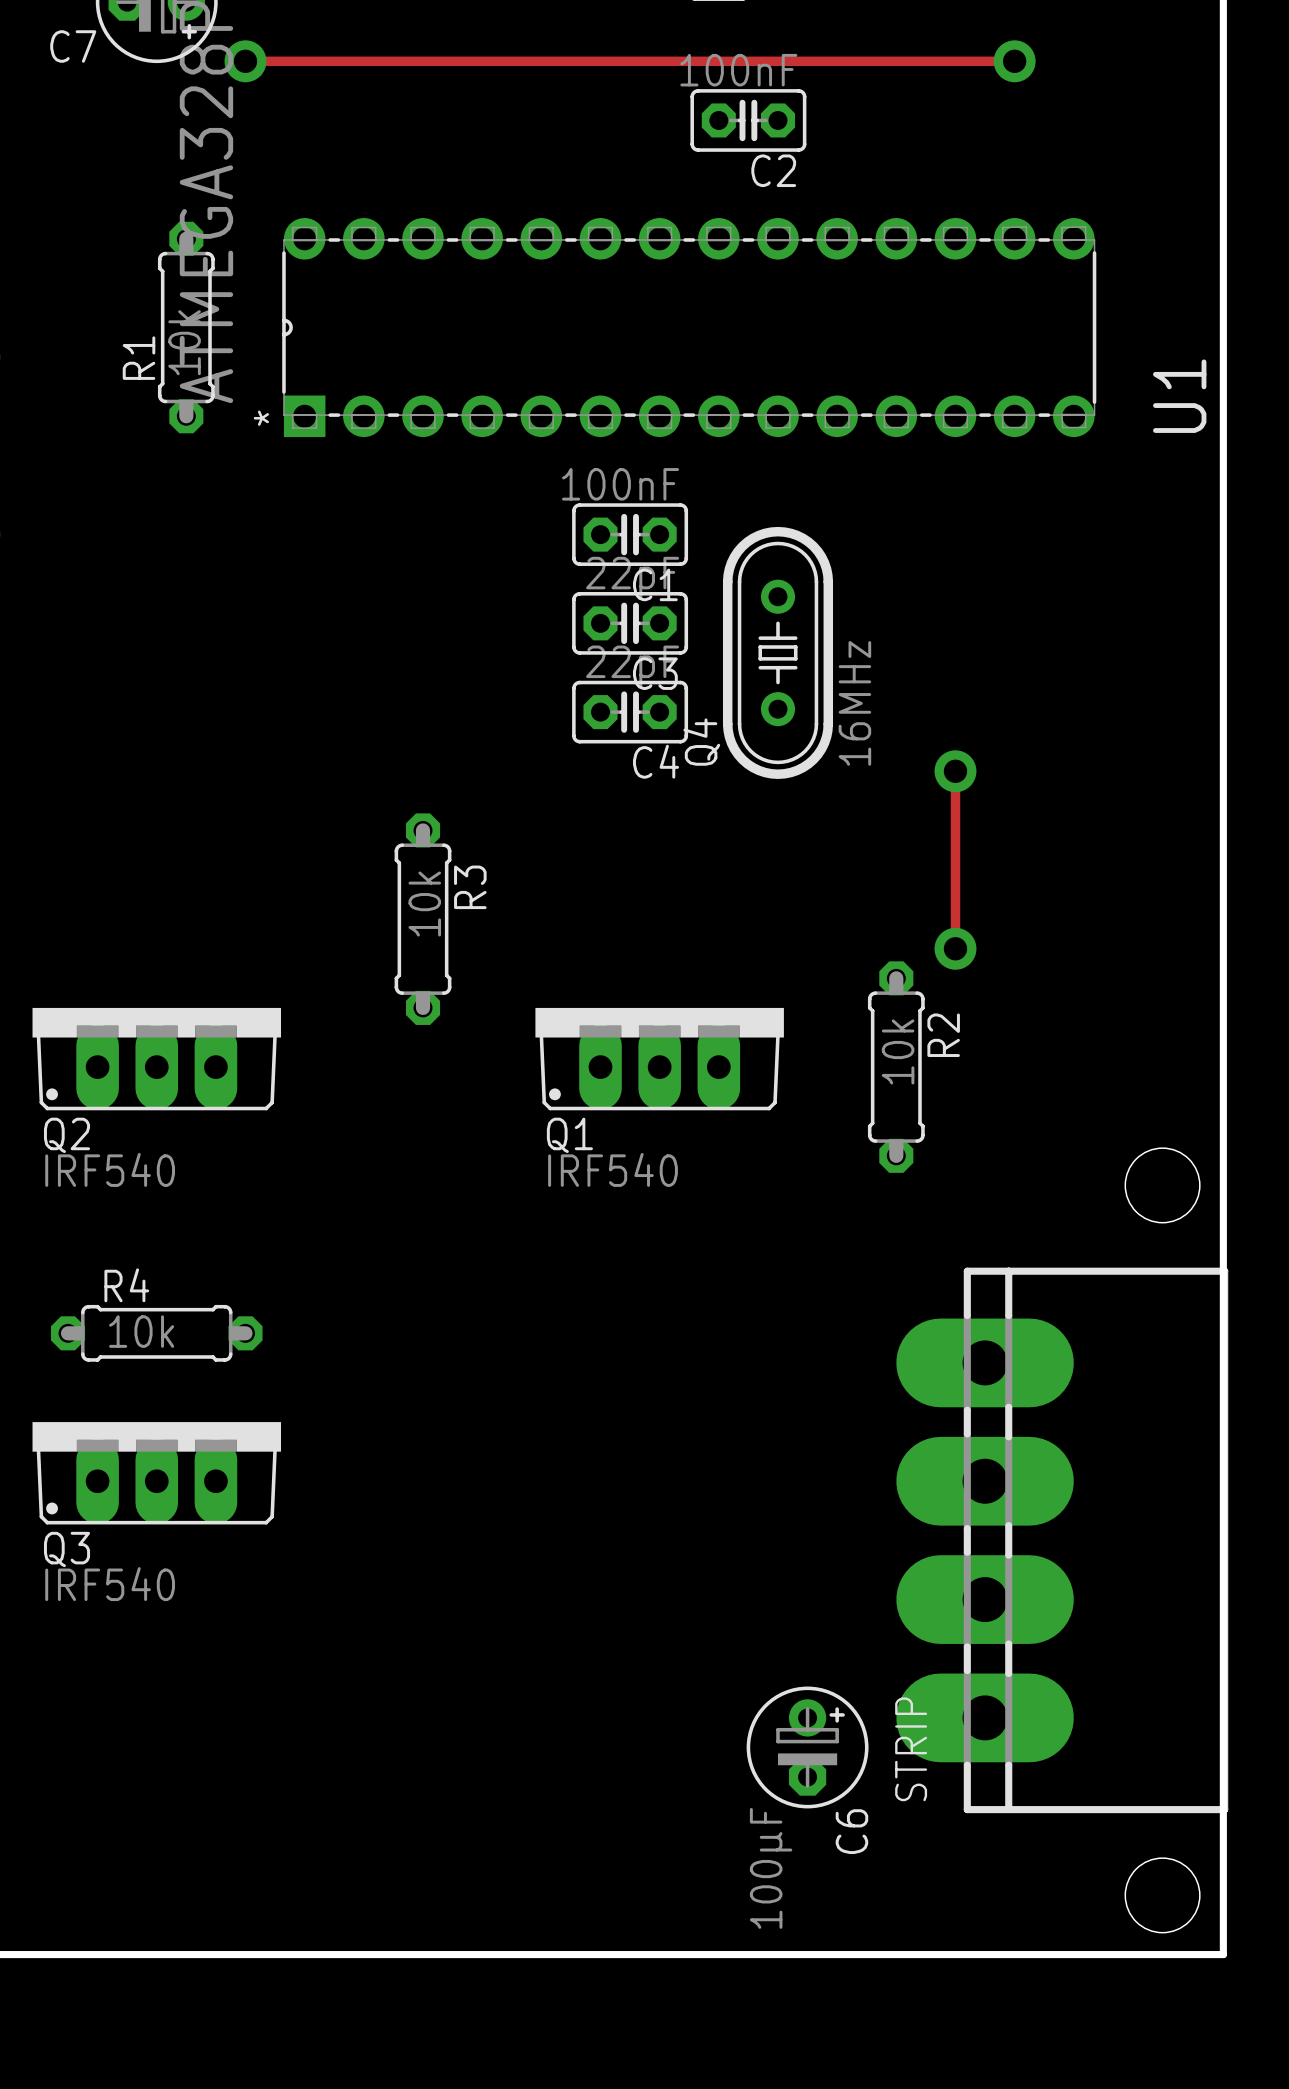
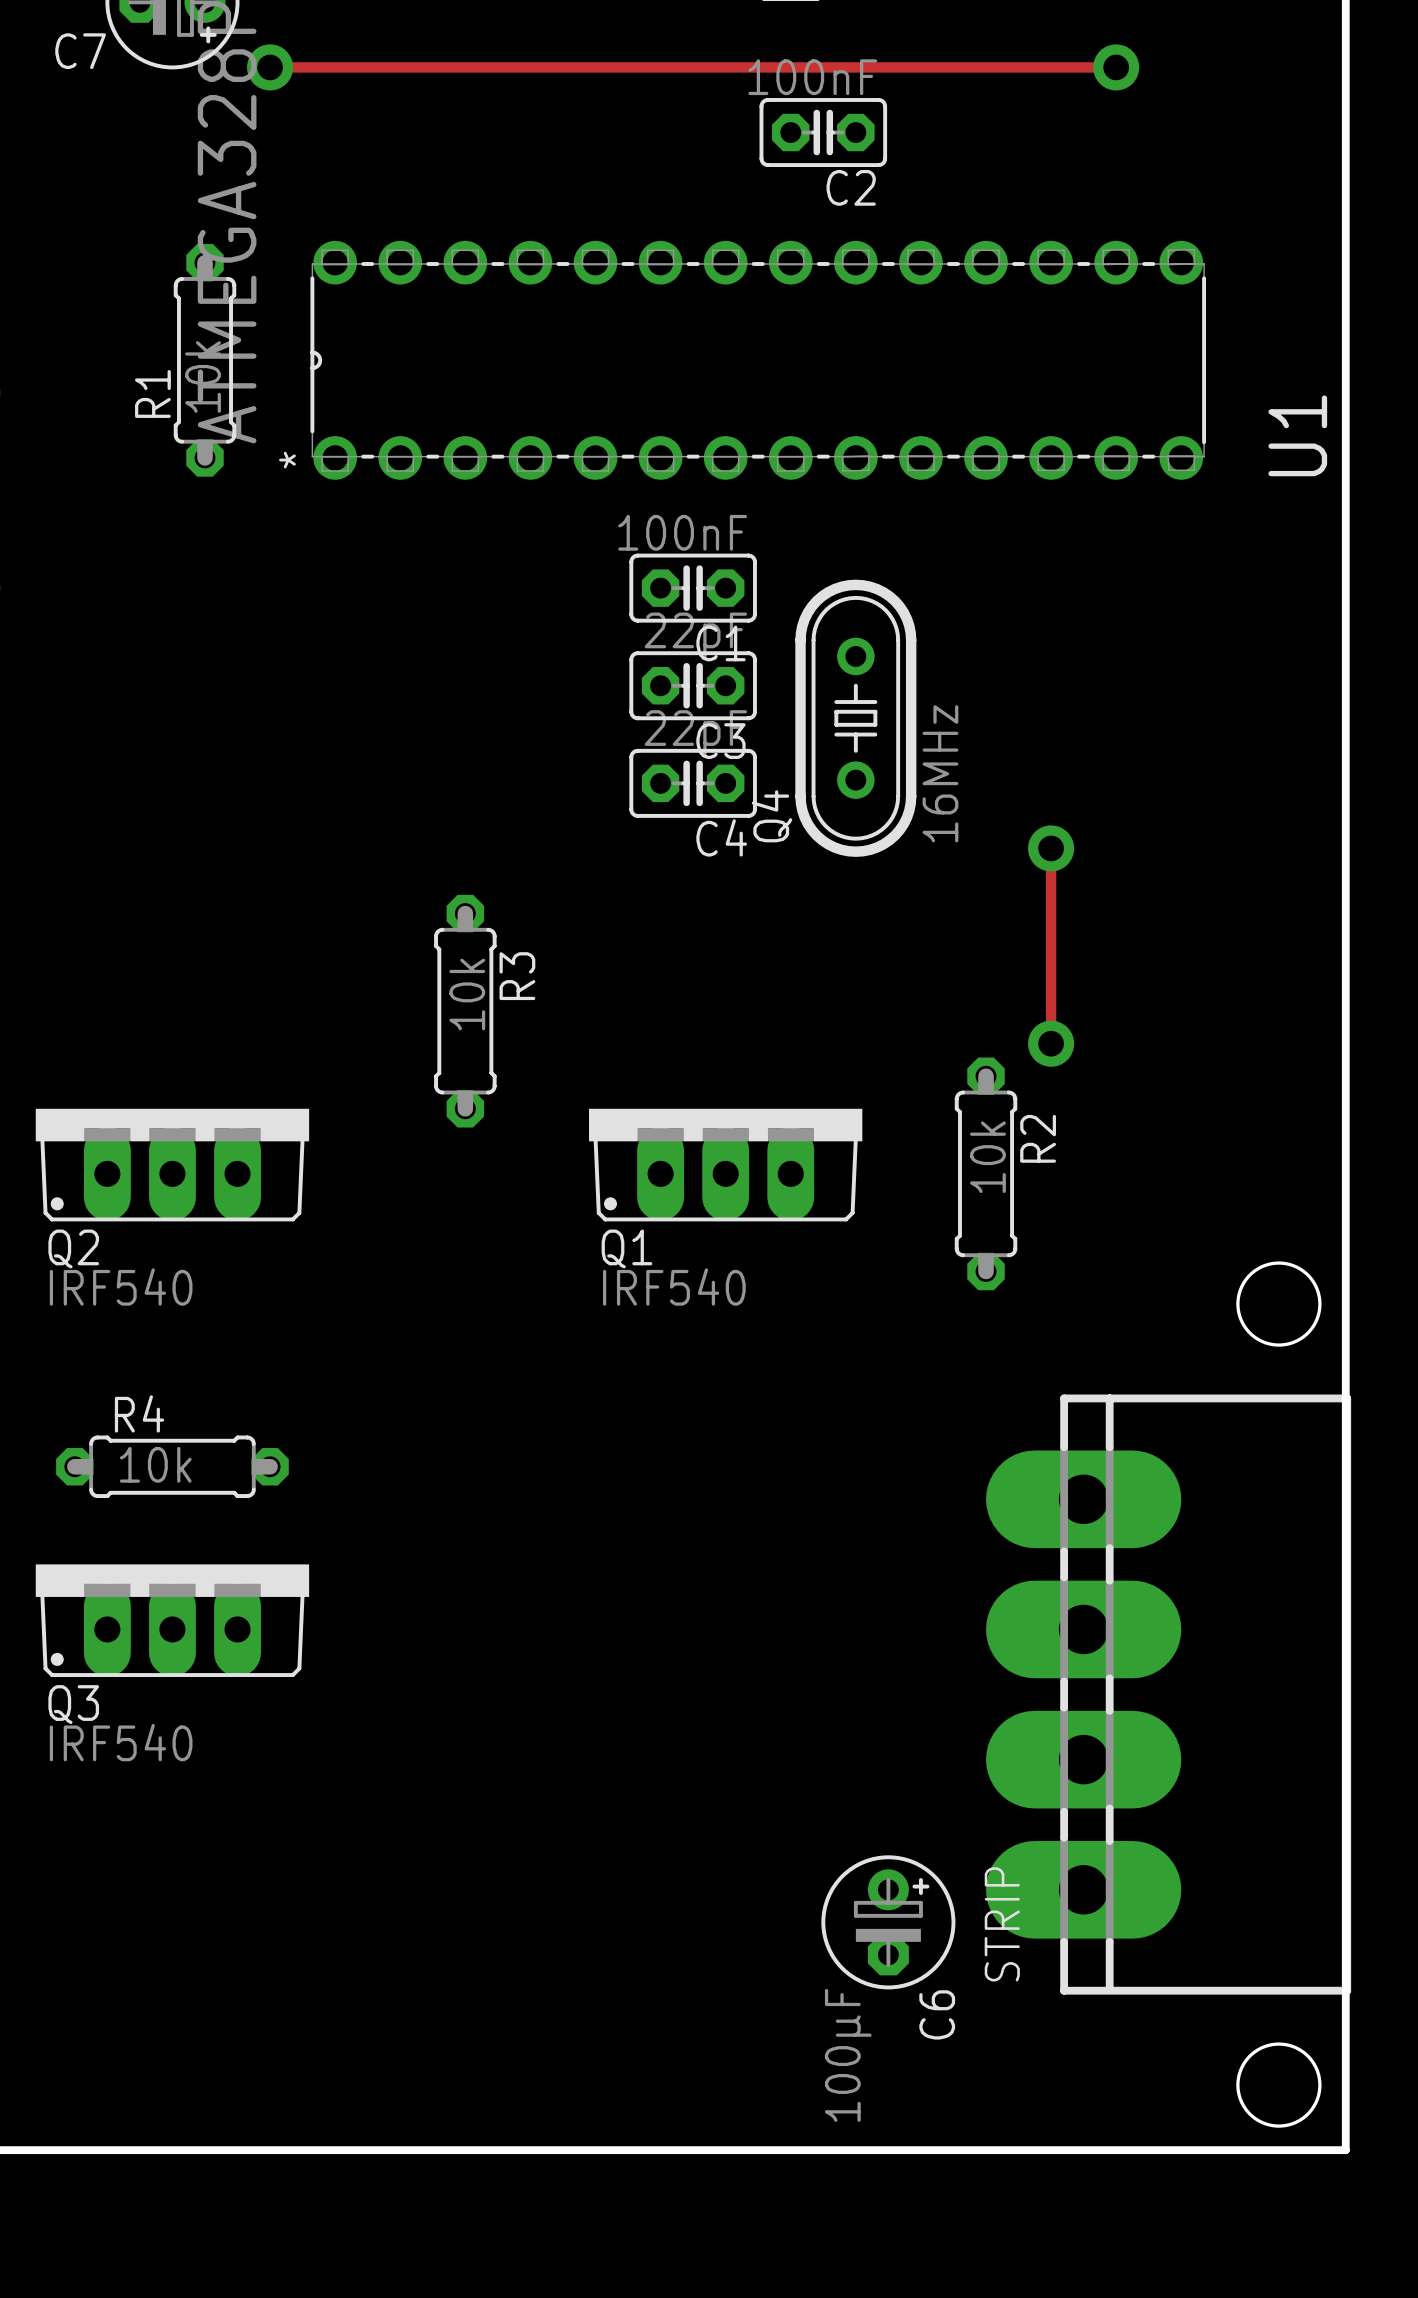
U1 footprint: [282, 218, 1097, 438] -> [310, 240, 1207, 480]
round board edge: none -> [1236, 1261, 1322, 1347]
round board edge: none -> [1236, 2042, 1322, 2128]

